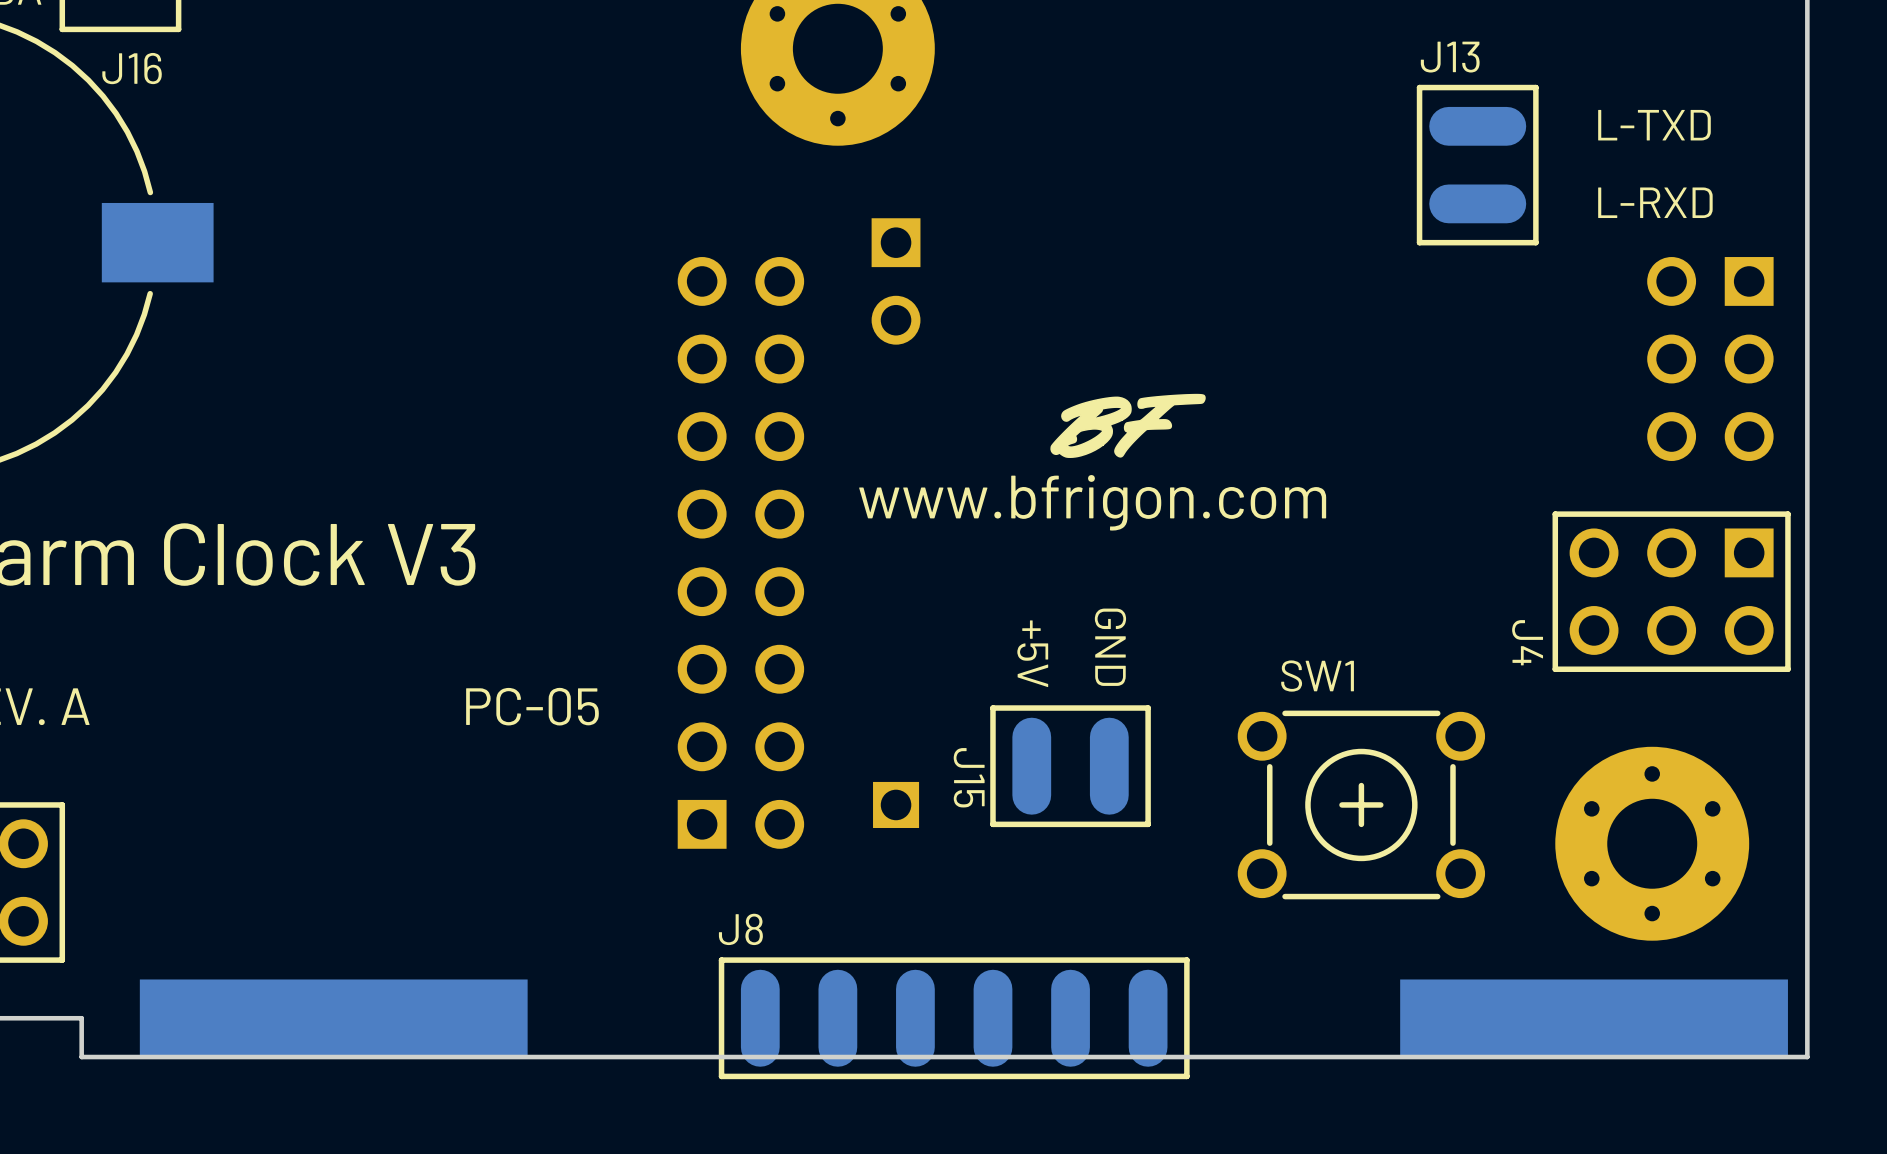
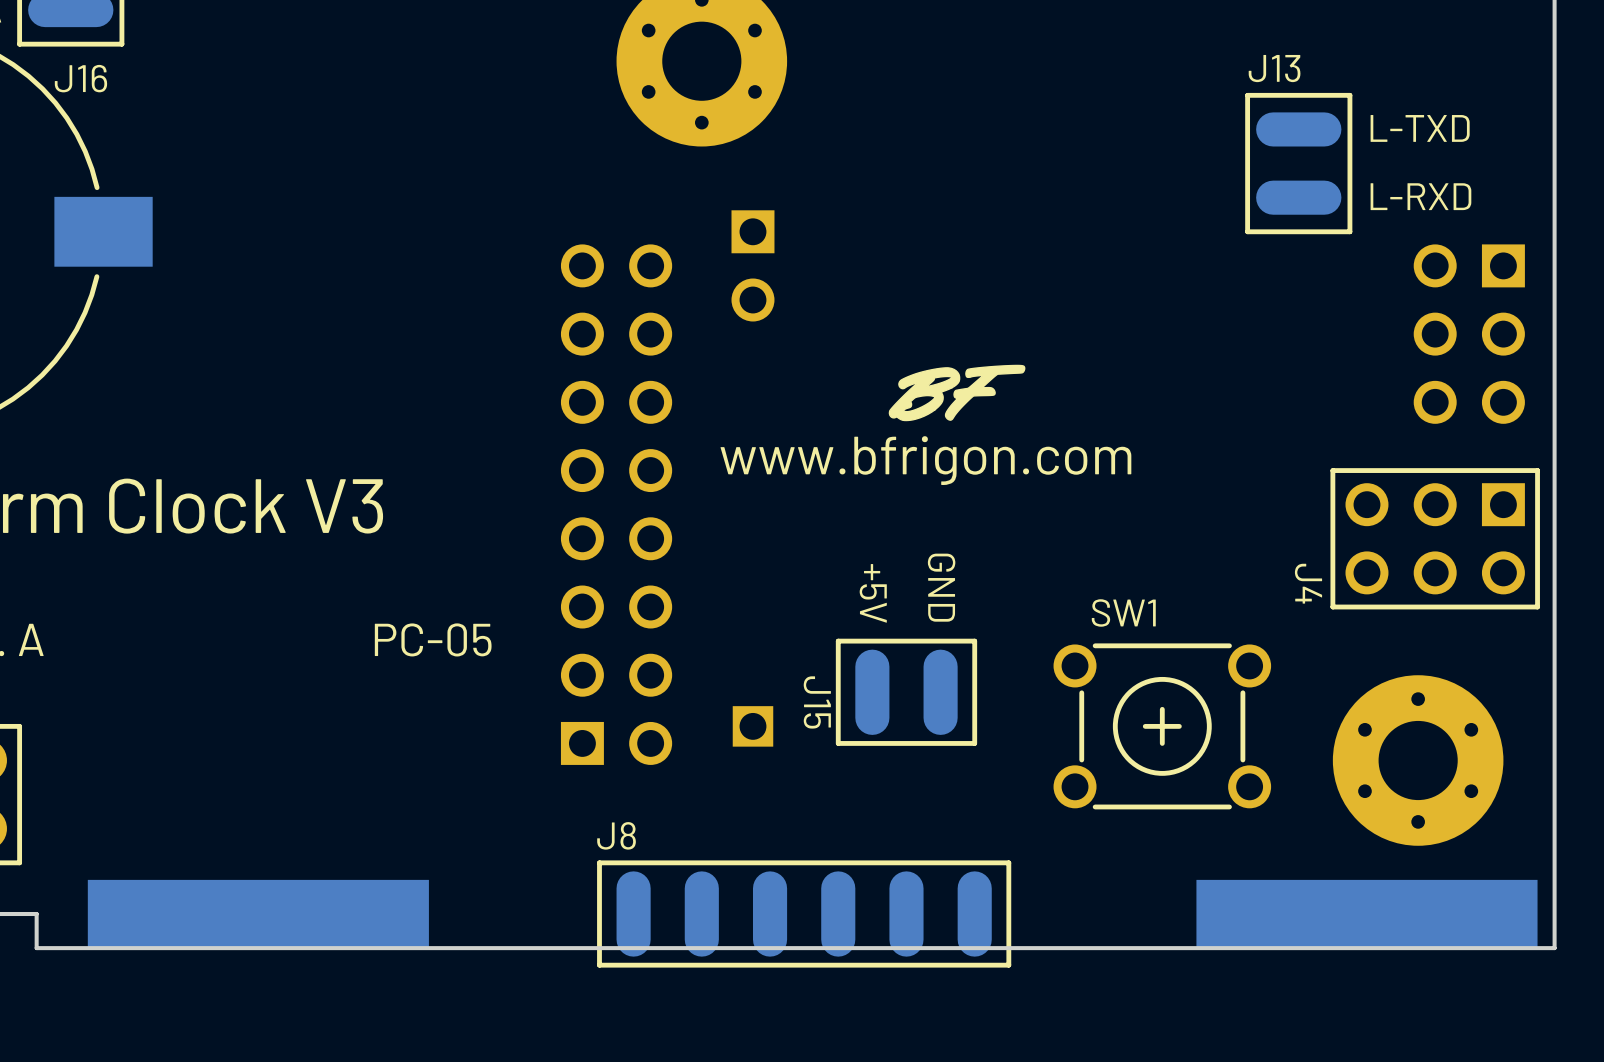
J13 position: (1477, 165) -> (1298, 163)

